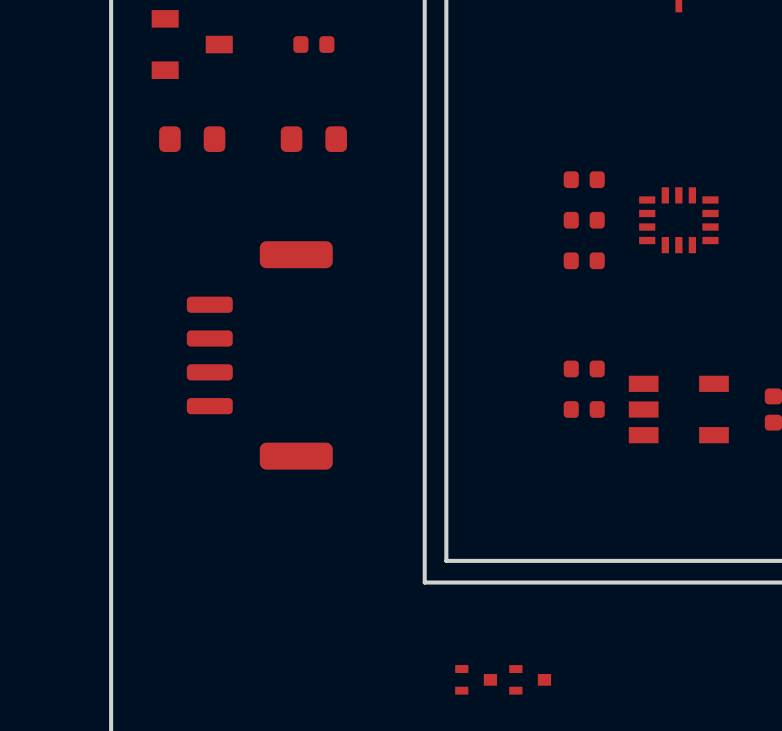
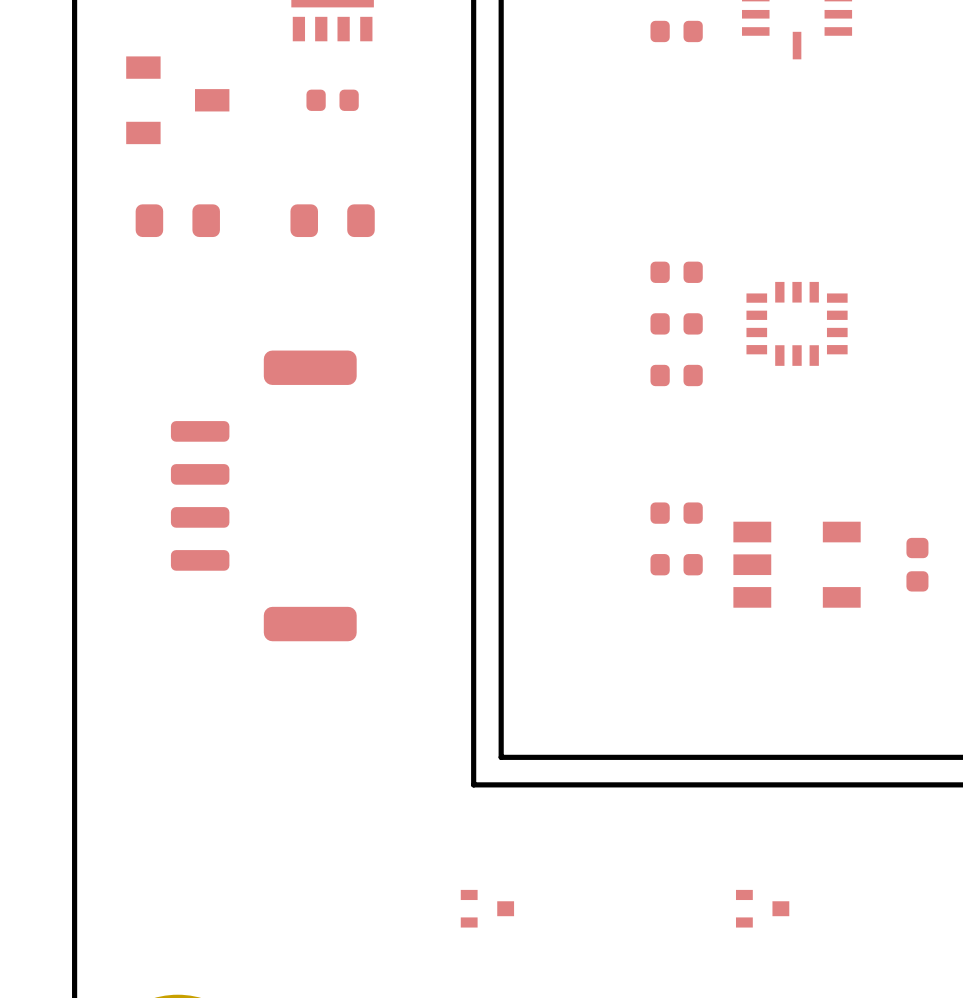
part position: (476, 679) -> (487, 908)
part: (530, 679) -> none
part: none -> (762, 908)

